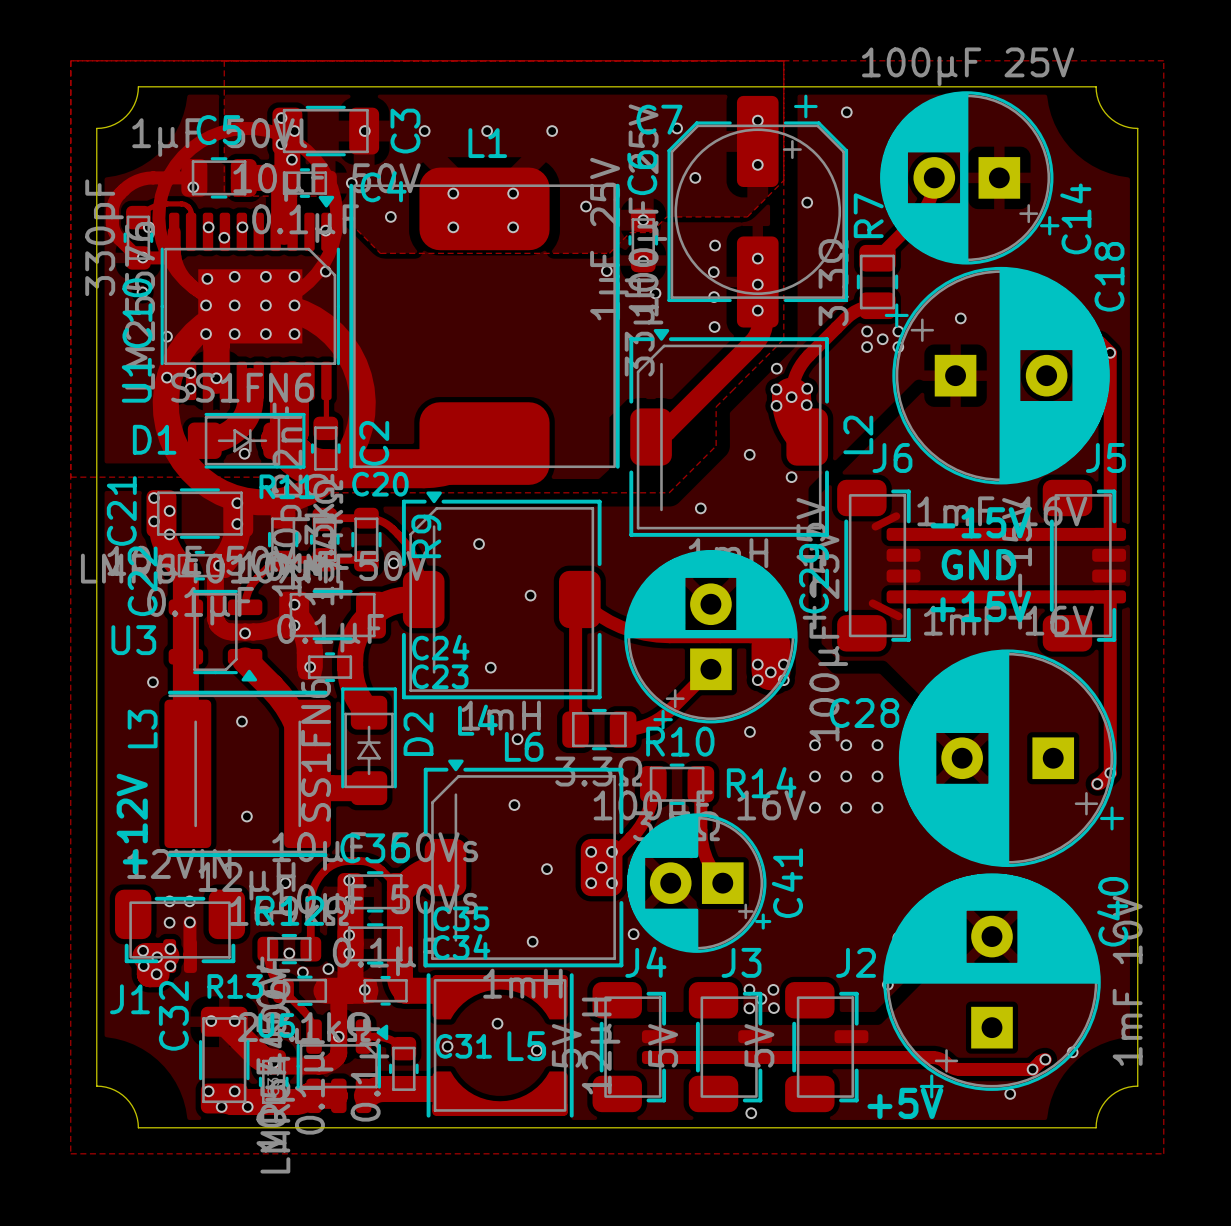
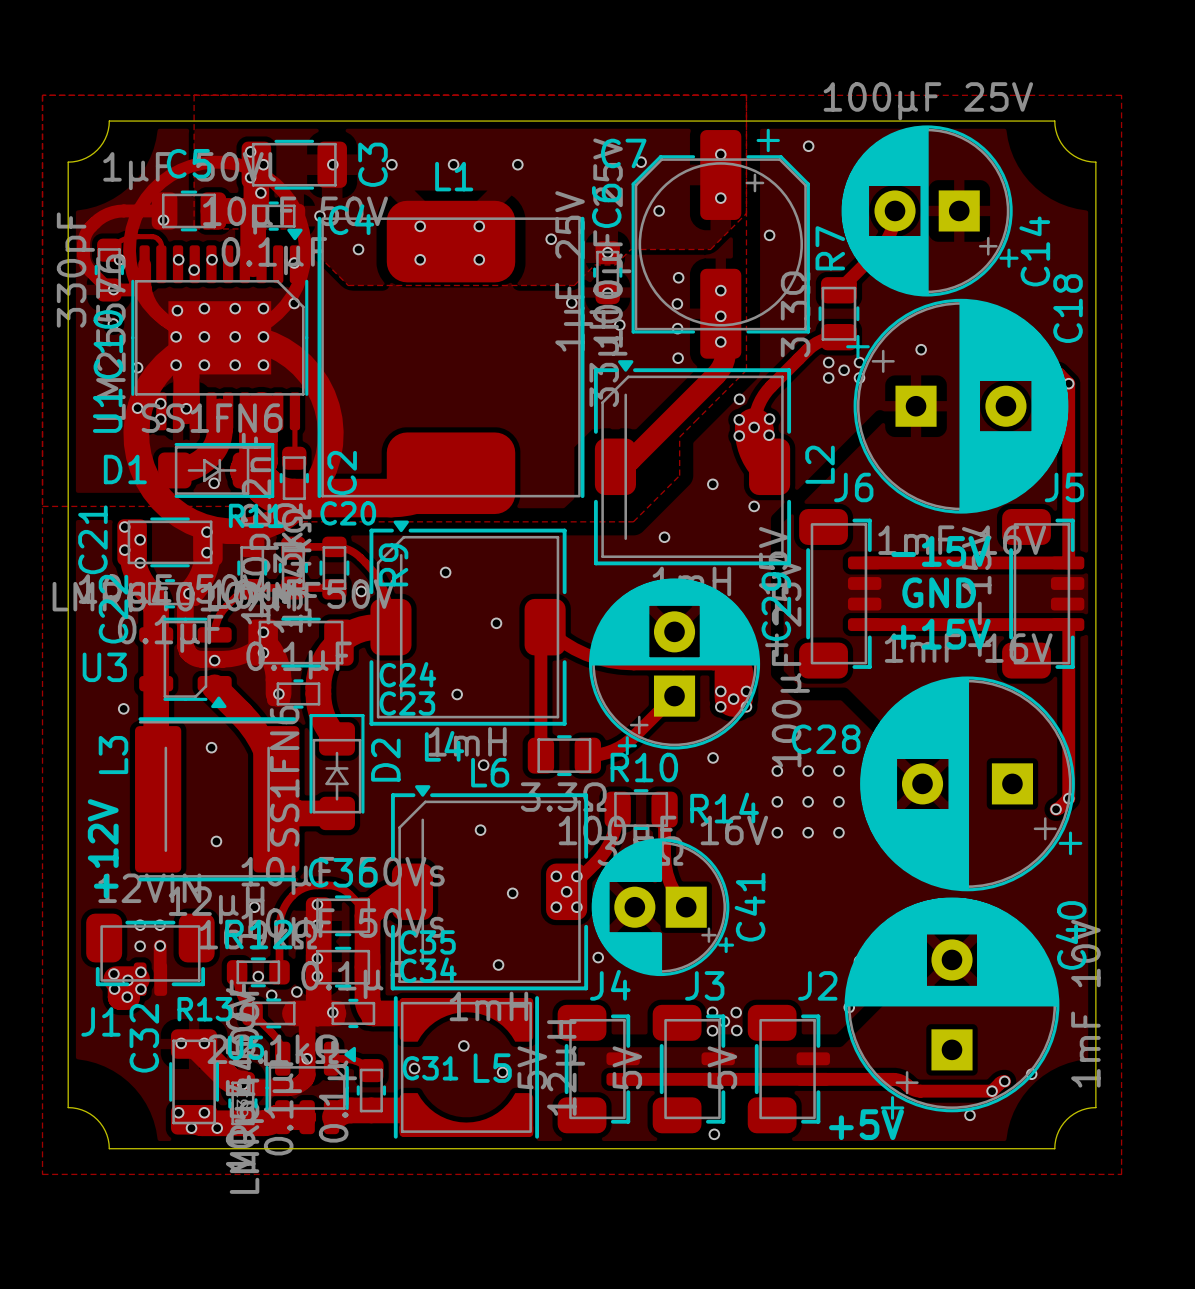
track: (896, 516) (875, 526) -> none
track: (872, 603) (898, 616) -> none

